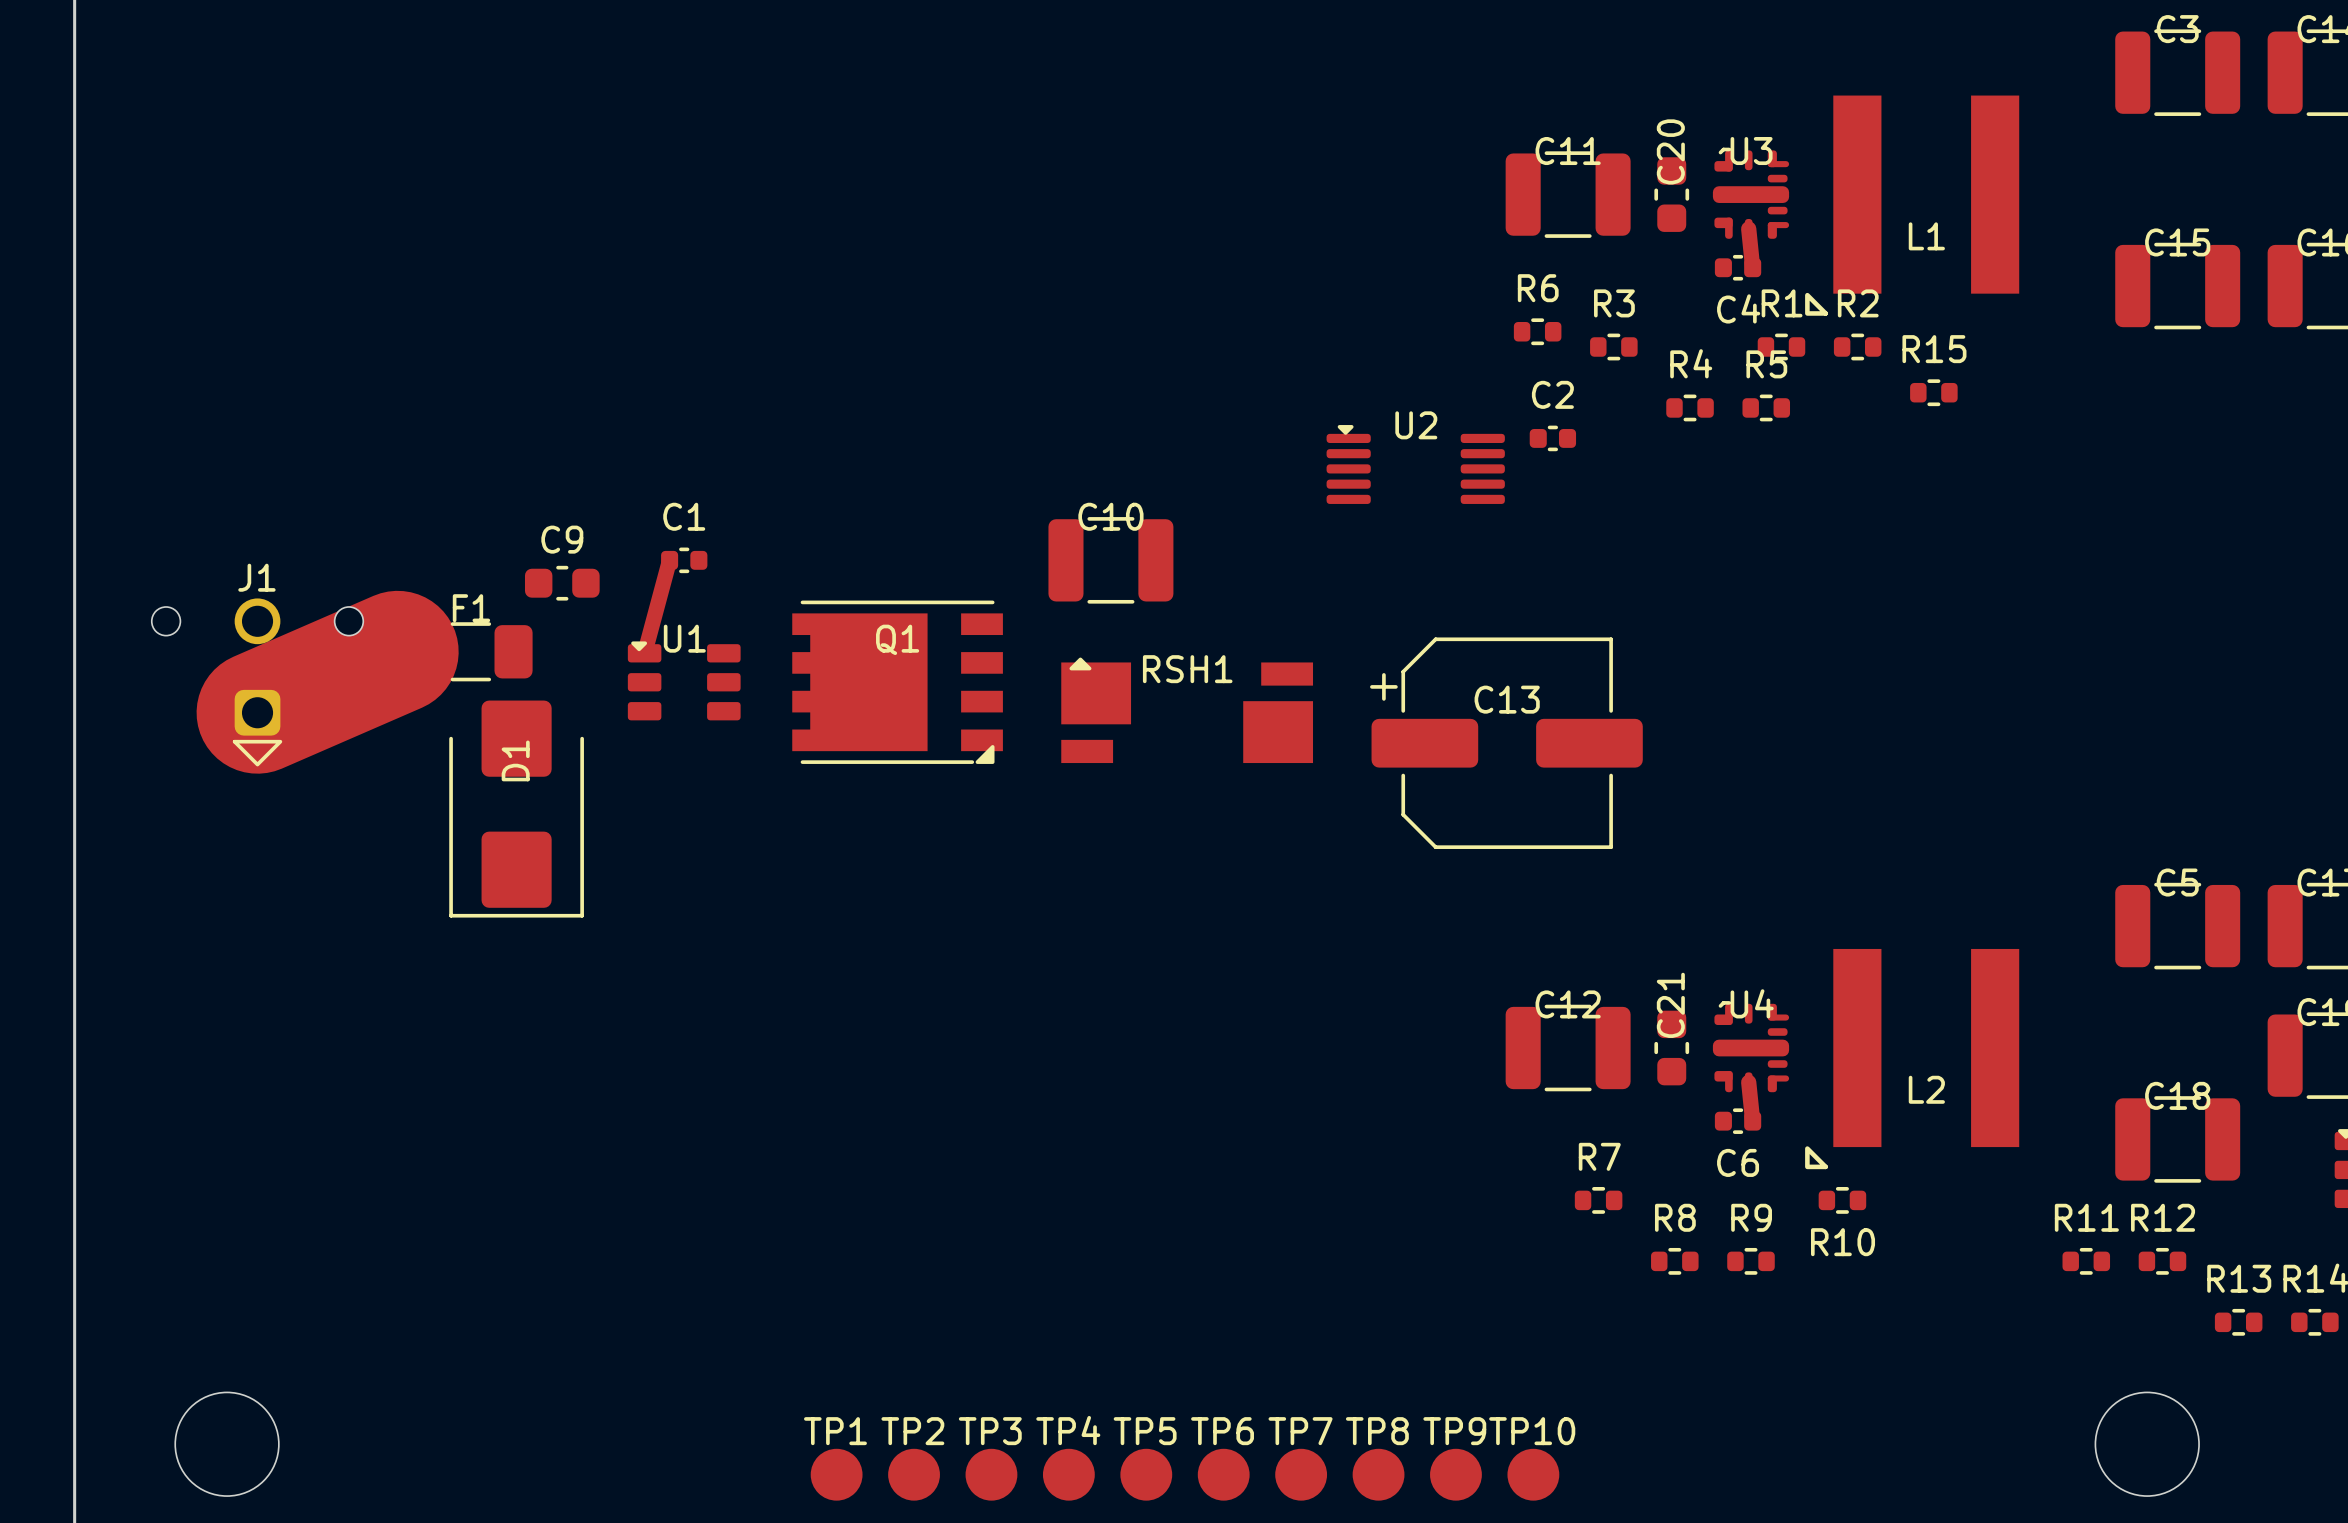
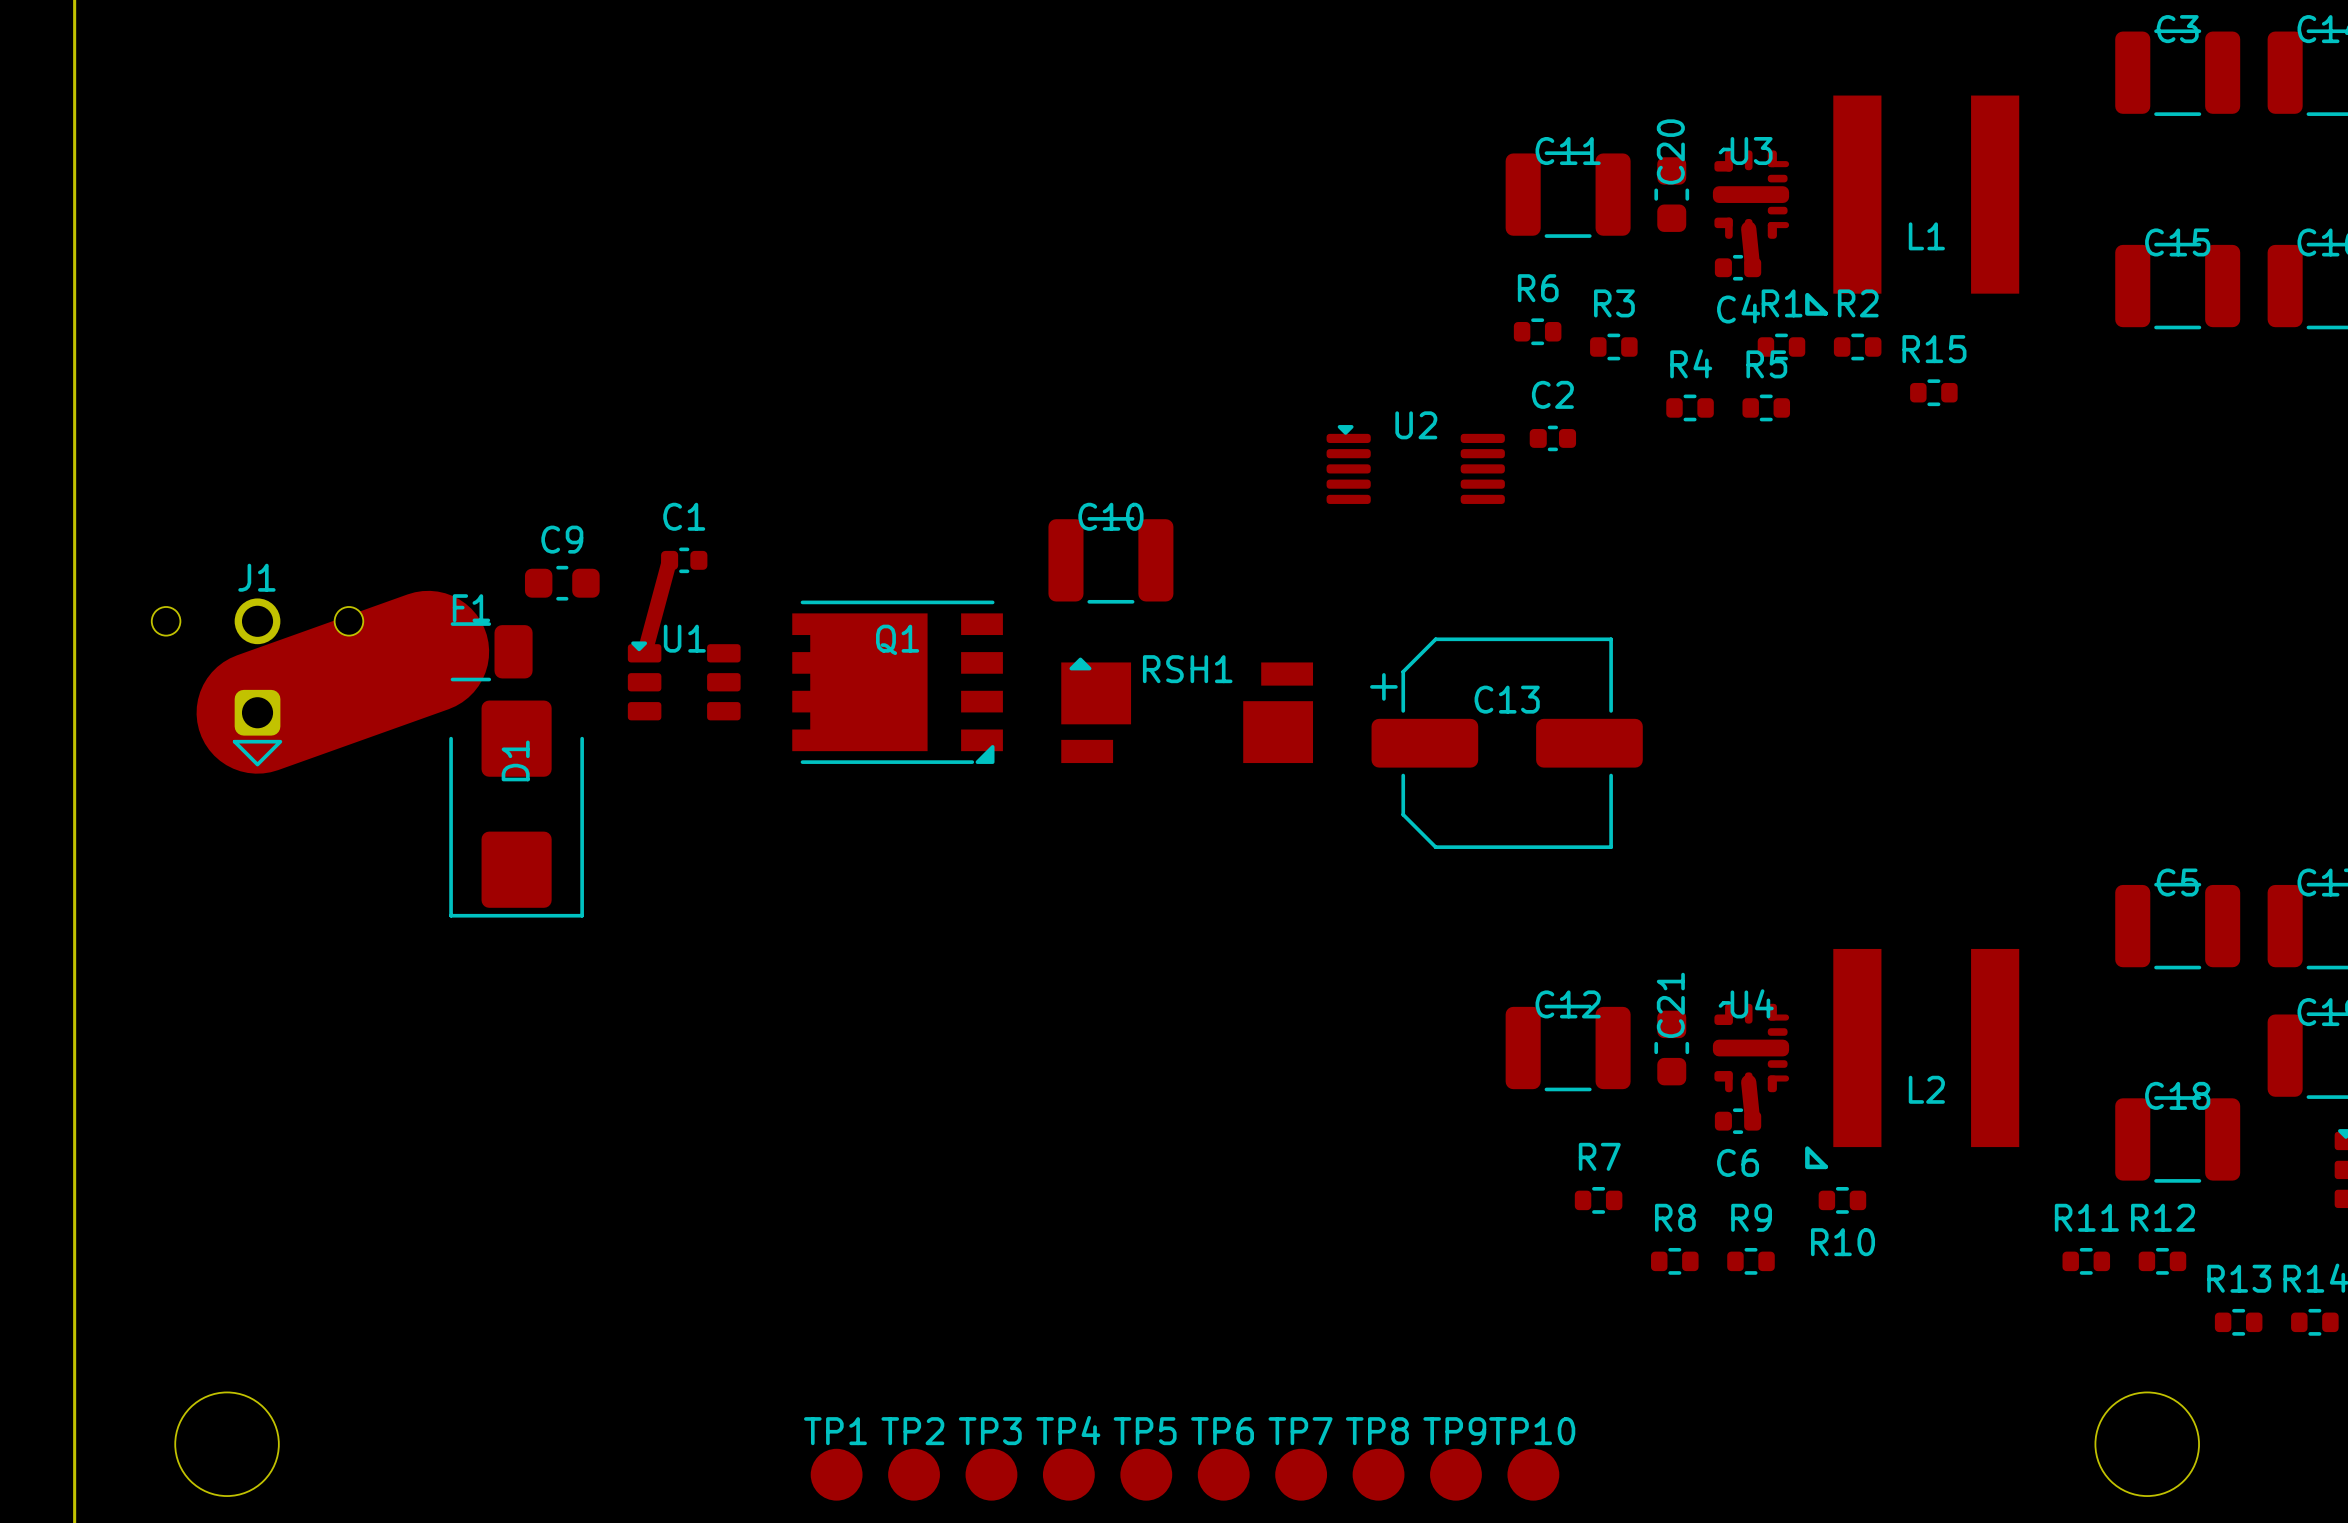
track: (397, 651) (257, 712) -> (428, 651) (257, 712)

